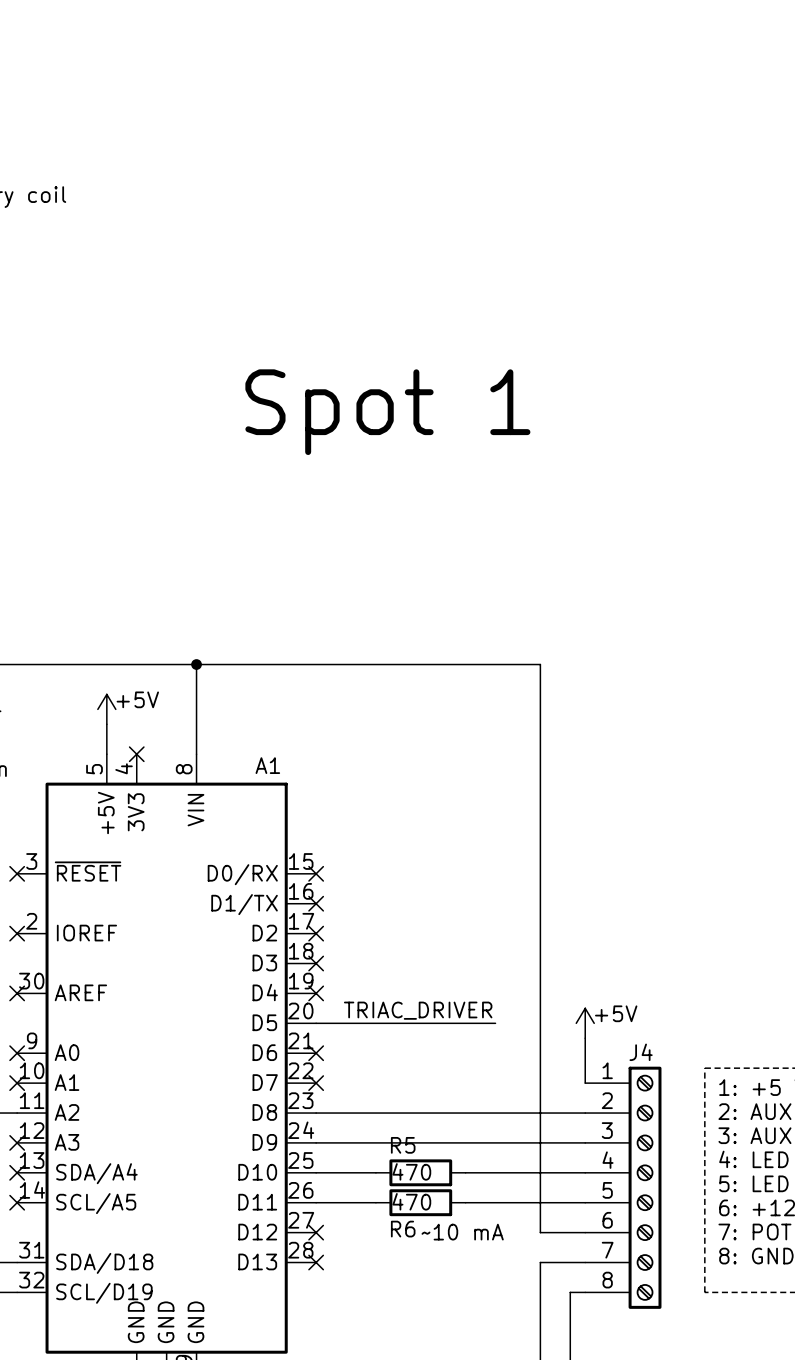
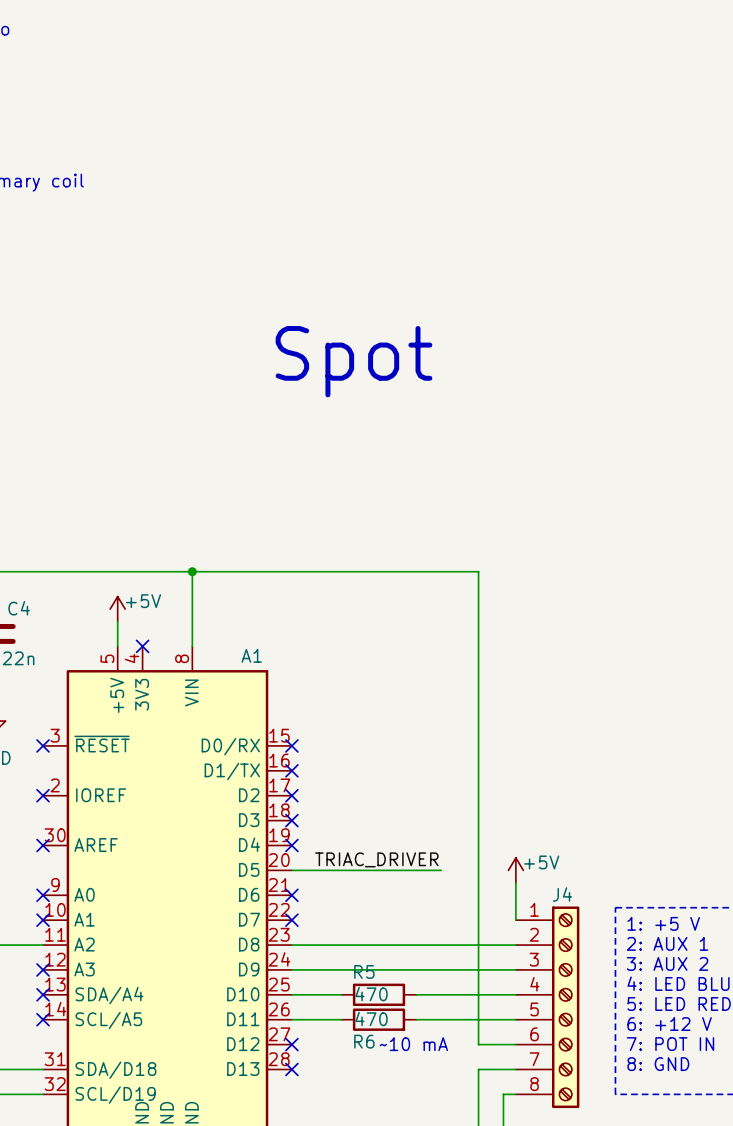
text: Spot 1 (387, 412) -> Spot (354, 361)

